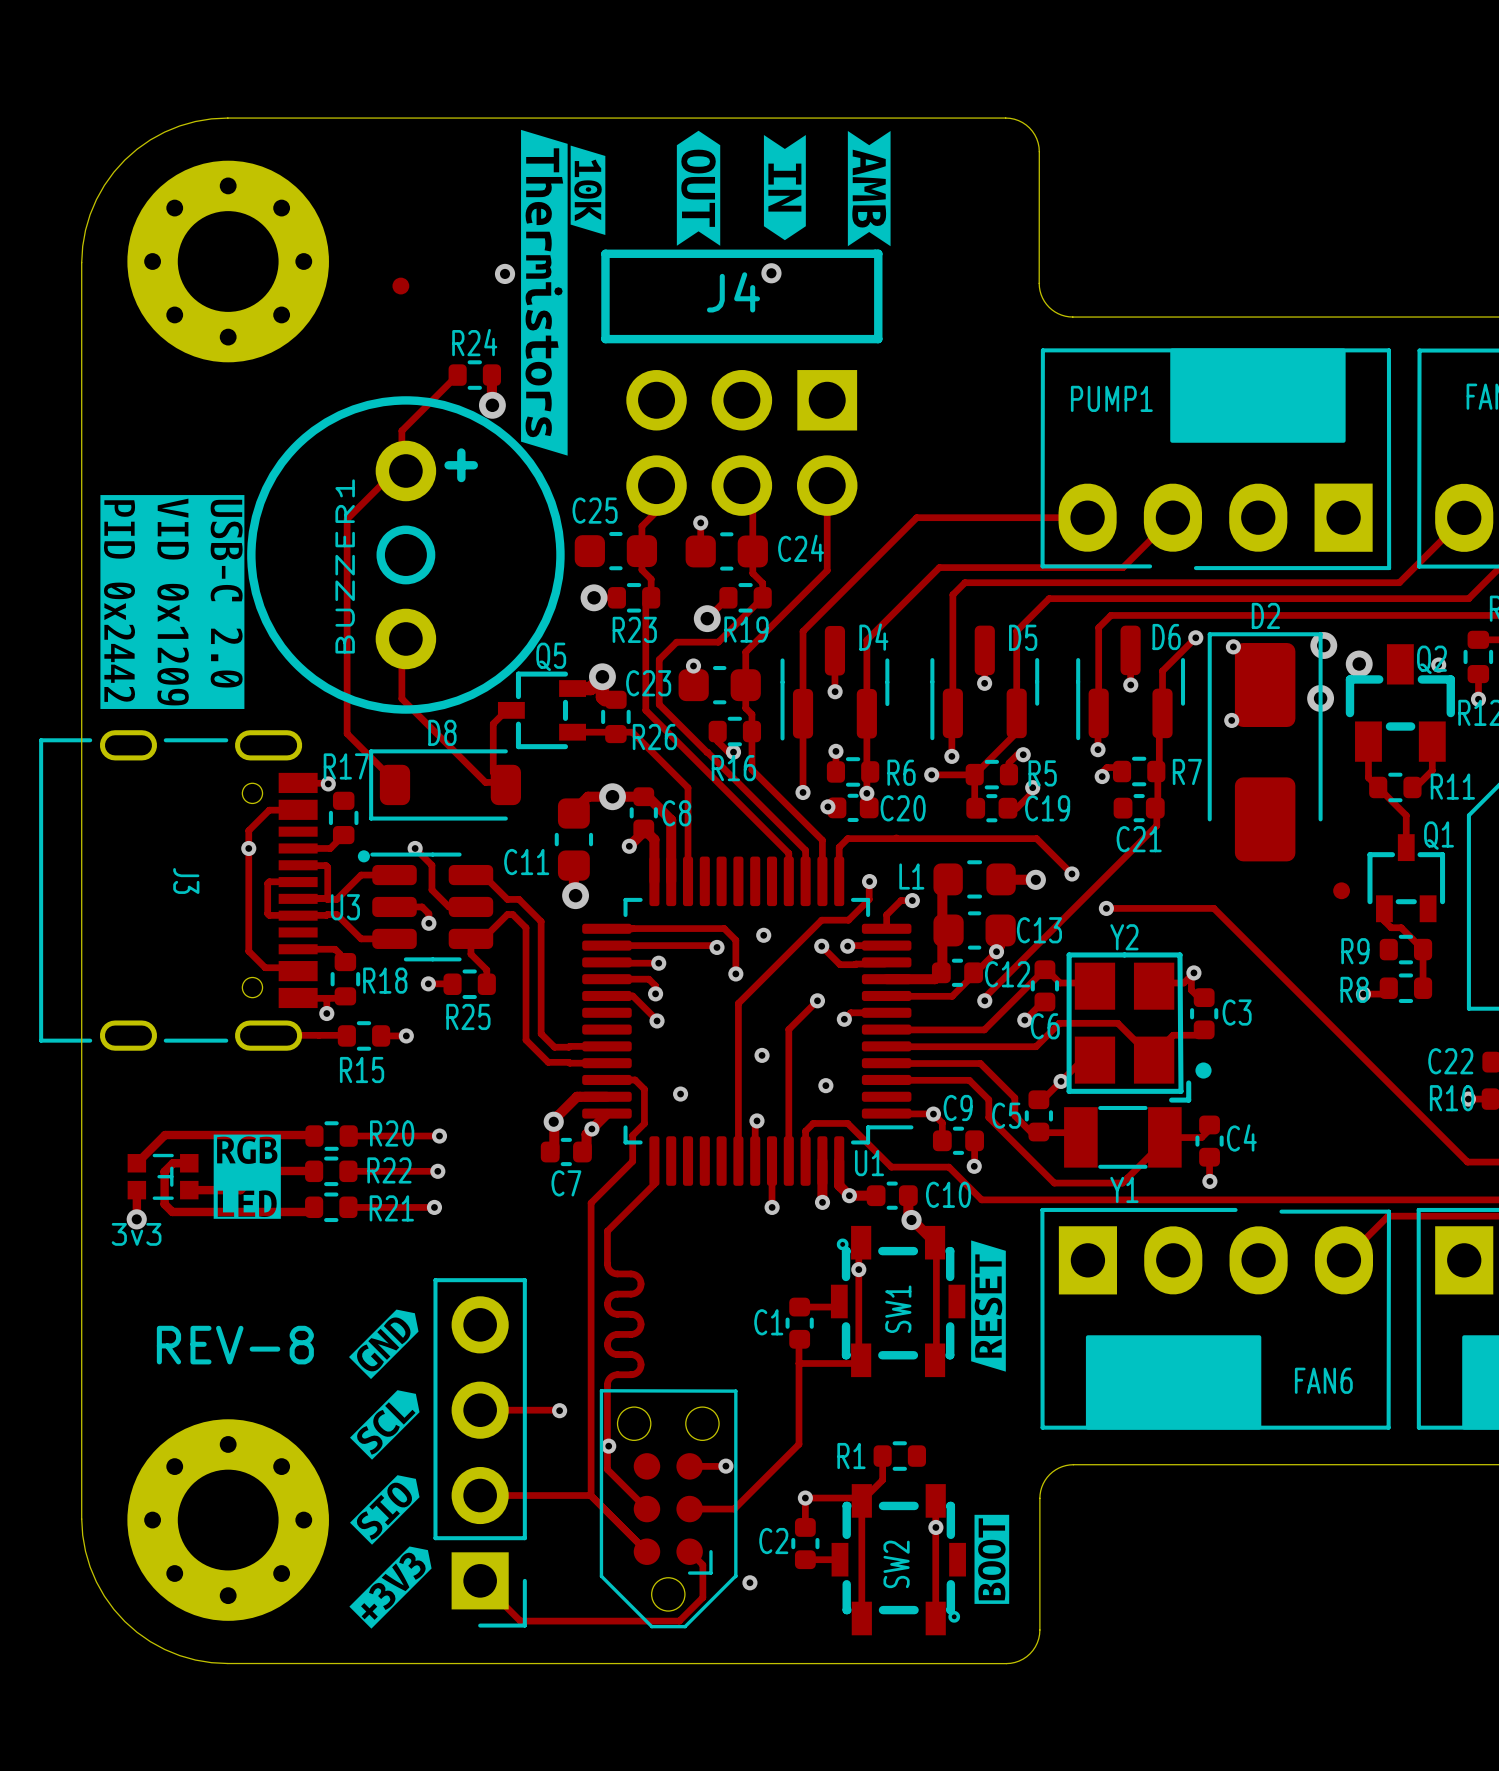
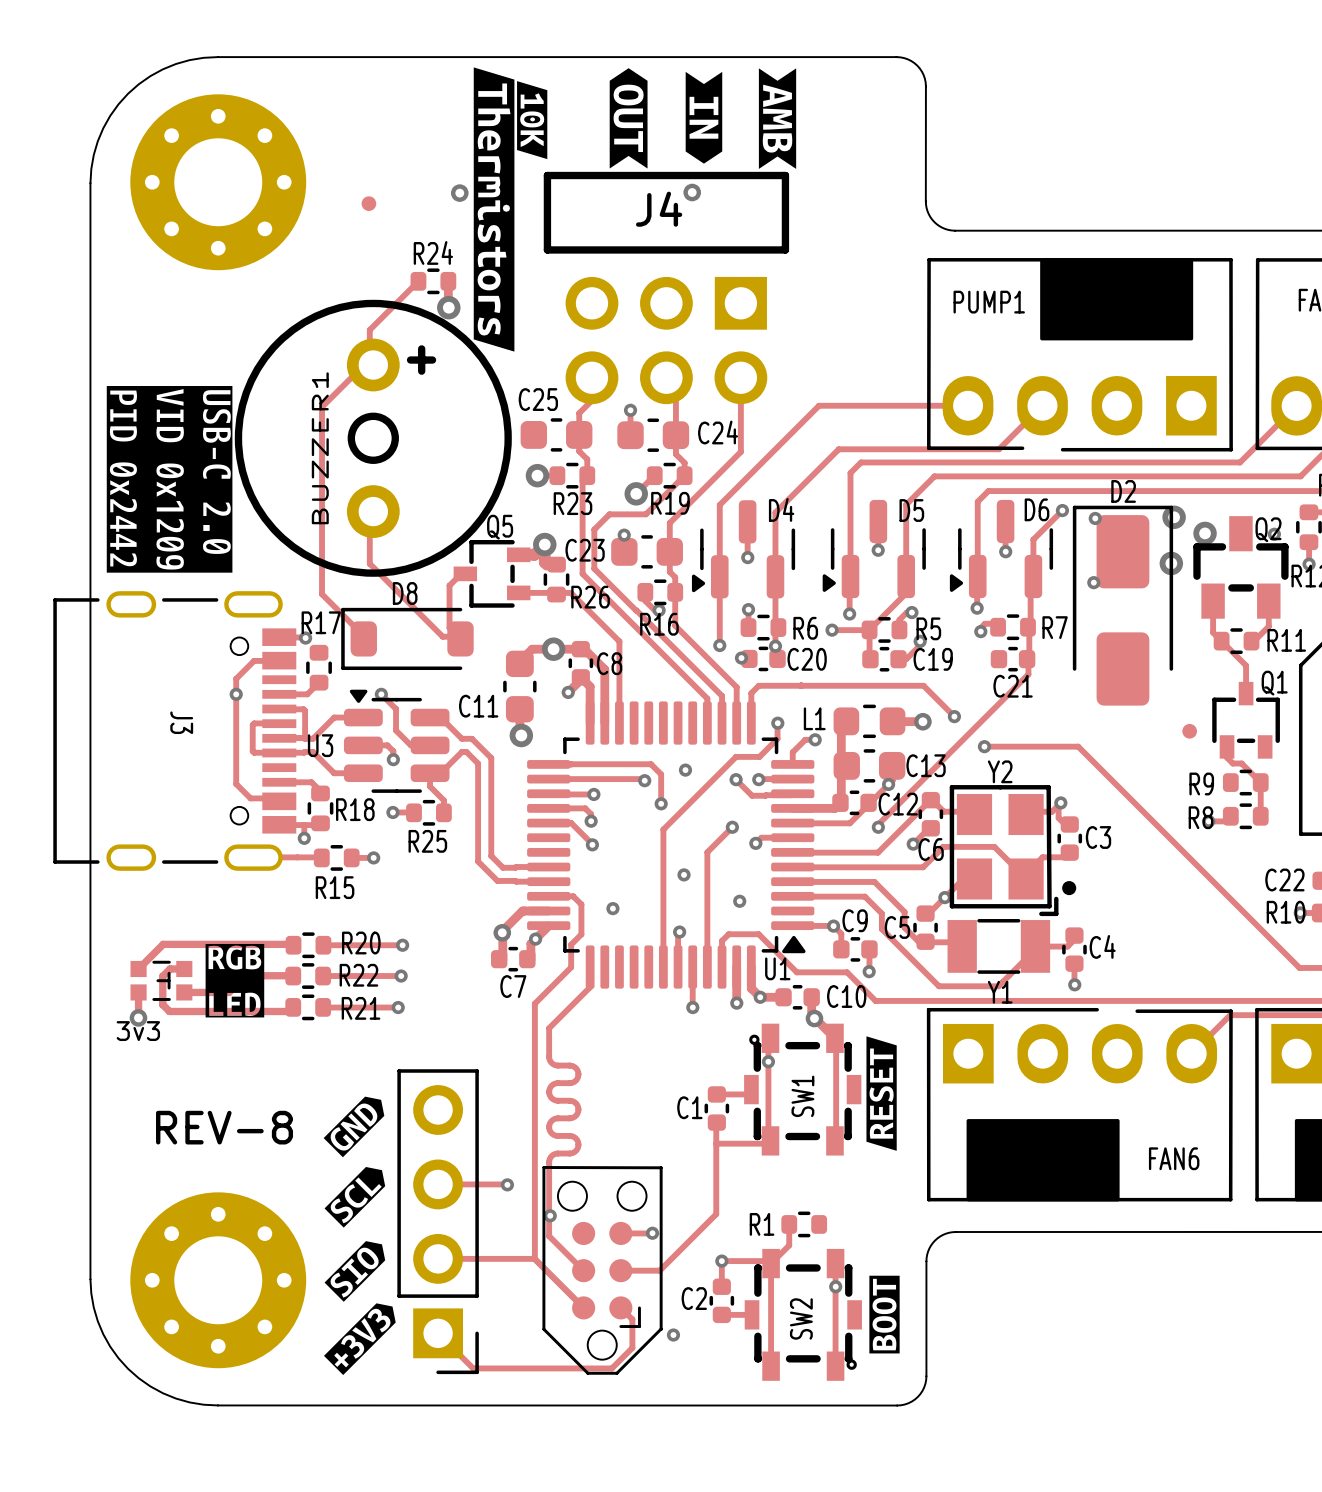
D4 footprint: [780, 625, 890, 741] -> [691, 500, 796, 599]
D5 footprint: [930, 625, 1040, 741] -> [822, 499, 926, 599]
D6 footprint: [1076, 625, 1186, 741] -> [949, 499, 1054, 599]
drawing: [357, 850, 370, 863] -> none
U3 footprint: [370, 852, 494, 962] -> [343, 689, 450, 793]
U1 footprint: [582, 856, 914, 1186] -> [527, 701, 815, 989]

